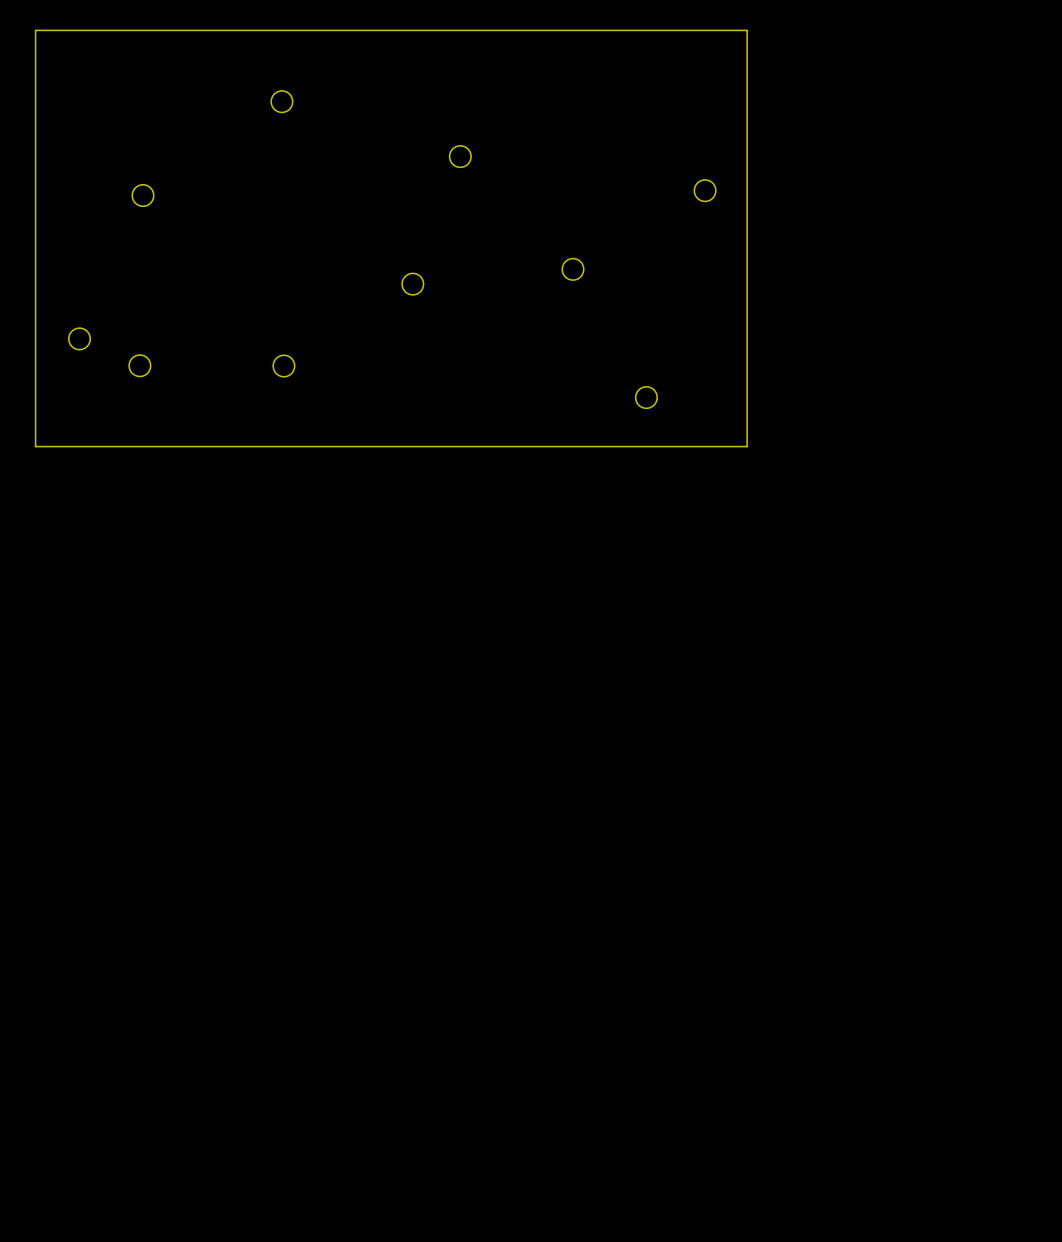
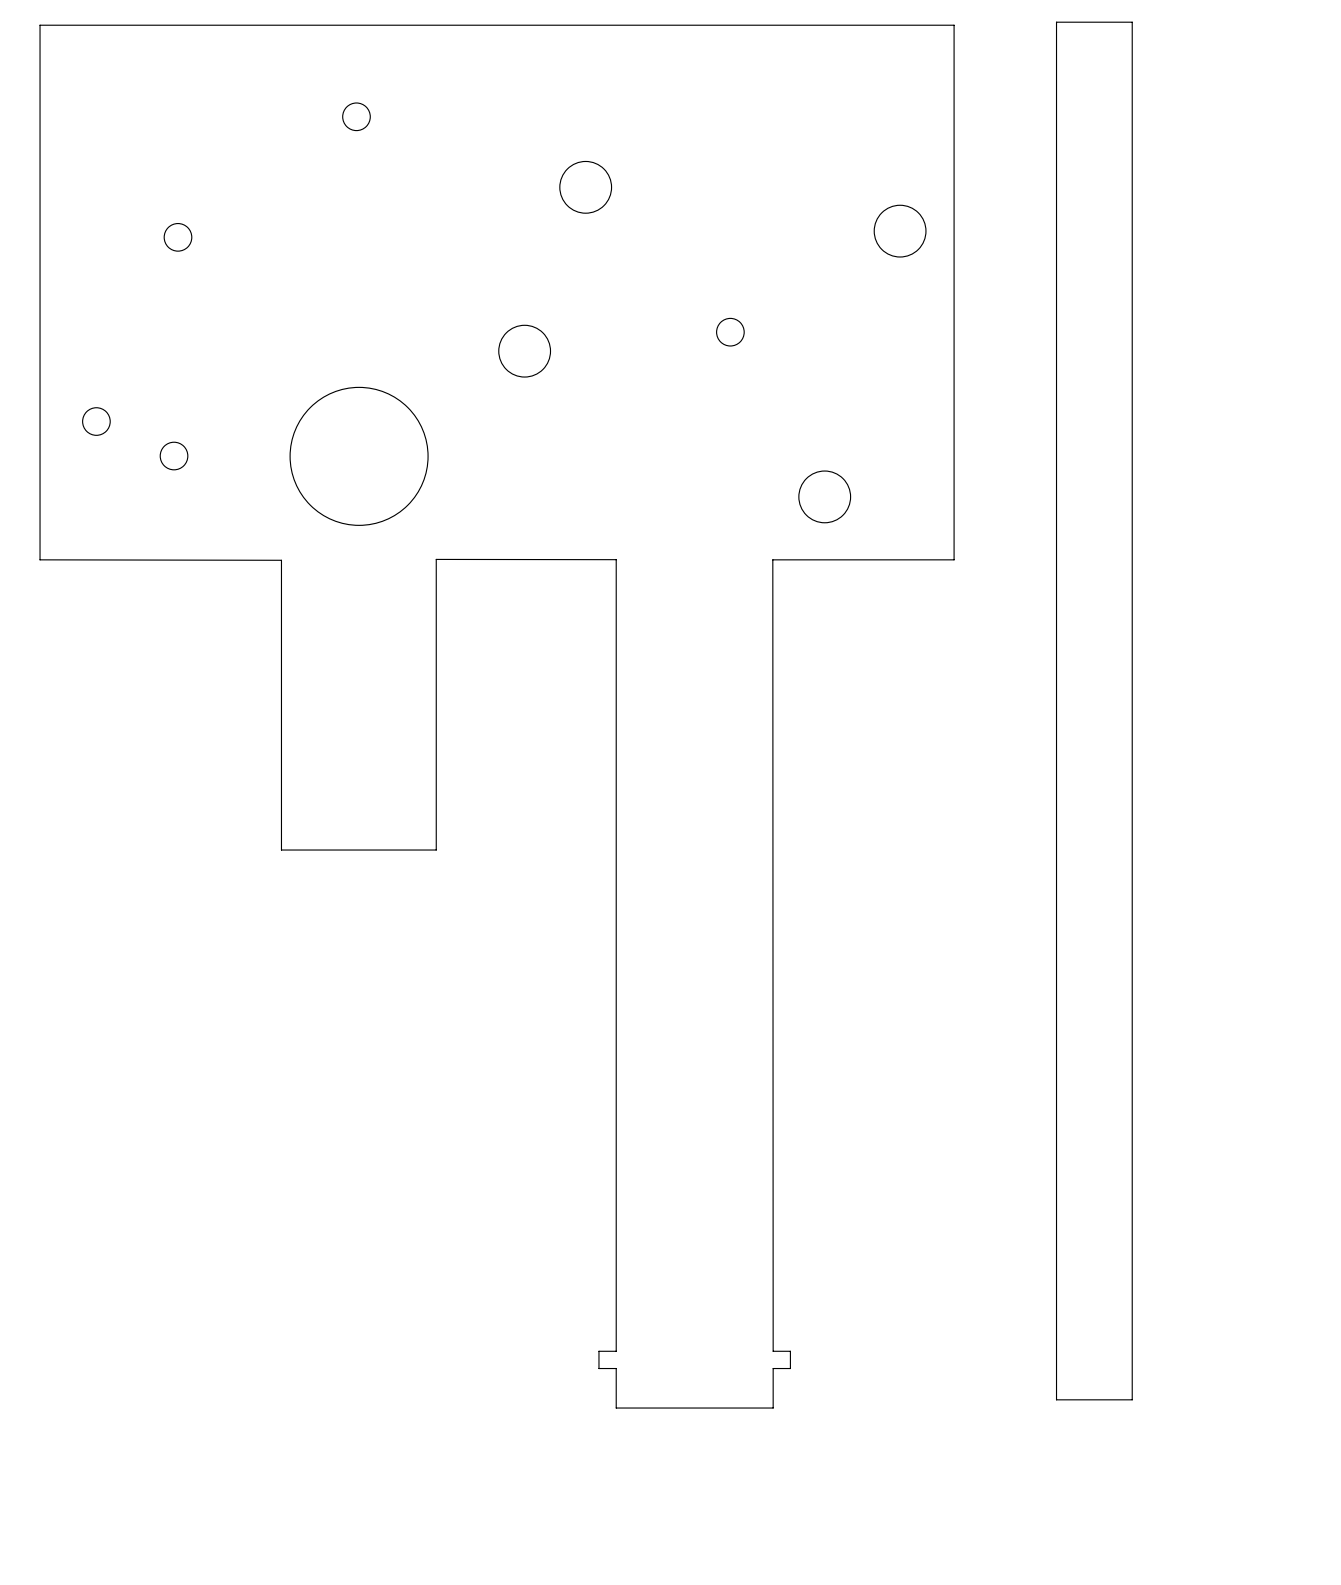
board edge: none -> (1132, 22) (1056, 22) (1056, 1399) (1132, 1399) (1132, 22)
round board edge size: [449, 145, 472, 168] -> [559, 161, 612, 214]
round board edge size: [694, 179, 717, 202] -> [873, 204, 927, 258]
round board edge size: [401, 273, 424, 296] -> [498, 324, 551, 378]
round board edge size: [272, 354, 296, 378] -> [289, 386, 429, 526]
round board edge size: [635, 386, 658, 409] -> [798, 470, 852, 524]
board edge: (606, 446) (35, 446) -> (598, 1351) (616, 1351) (616, 559) (436, 559) (436, 850) (281, 850) (281, 560) (40, 559)
board edge: none -> (772, 559) (773, 1351) (790, 1351)
part: none -> (694, 1379)

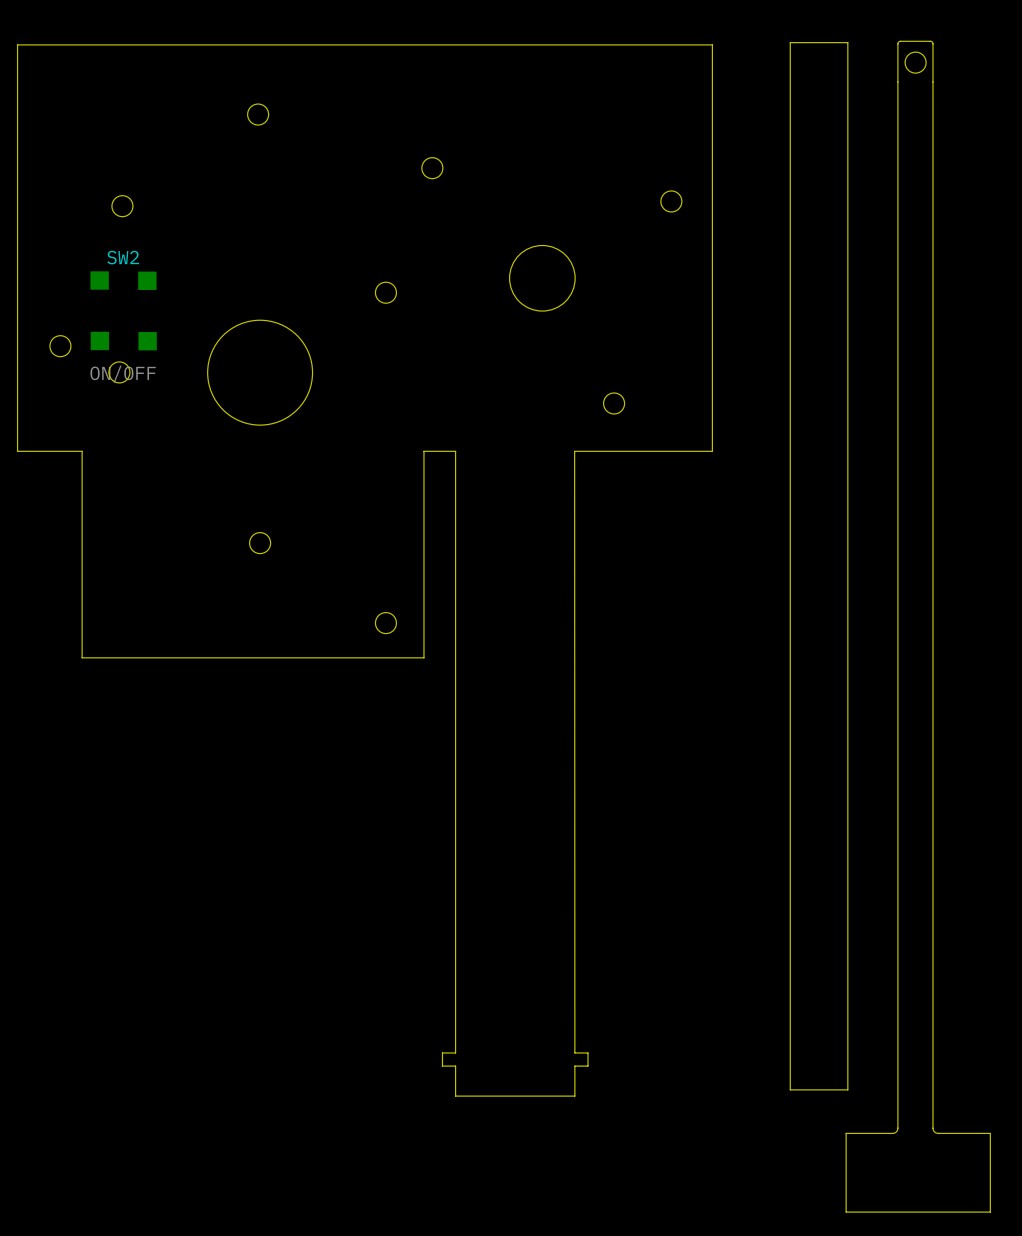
board edge: none -> (930, 41) (900, 41) (897, 43) (897, 1128) (893, 1133) (846, 1133) (846, 1212) (990, 1212) (990, 1133) (937, 1133) (932, 1128) (932, 43) (930, 41)
round board edge: none -> [904, 51, 927, 74]
round board edge size: [559, 161, 612, 214] -> [421, 157, 444, 179]
round board edge size: [873, 204, 927, 258] -> [660, 190, 683, 213]
round board edge size: [716, 317, 745, 347] -> [509, 245, 576, 312]
round board edge size: [498, 324, 551, 378] -> [375, 281, 397, 304]
SW2: none -> ON/OFF (123, 310)
round board edge size: [798, 470, 852, 524] -> [603, 392, 625, 415]
board edge: (616, 559) (436, 559) (436, 850) (281, 850) (281, 560) (40, 559) -> (455, 451) (423, 451) (423, 657) (82, 657) (82, 451) (17, 451)
round board edge: none -> [249, 532, 271, 554]
round board edge: none -> [375, 612, 397, 634]

